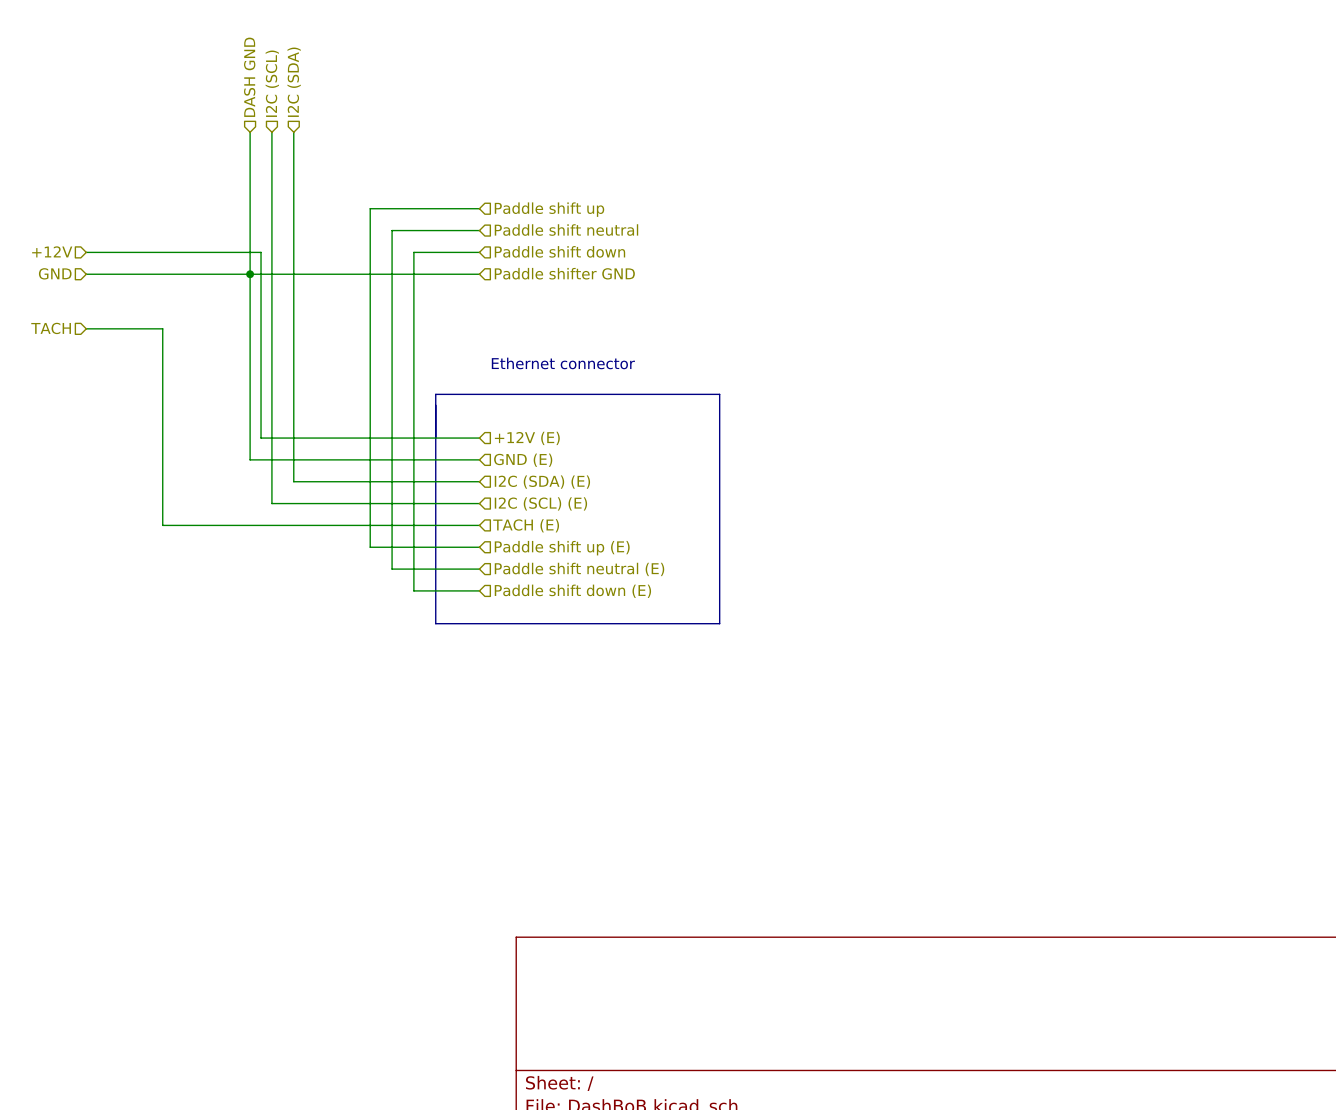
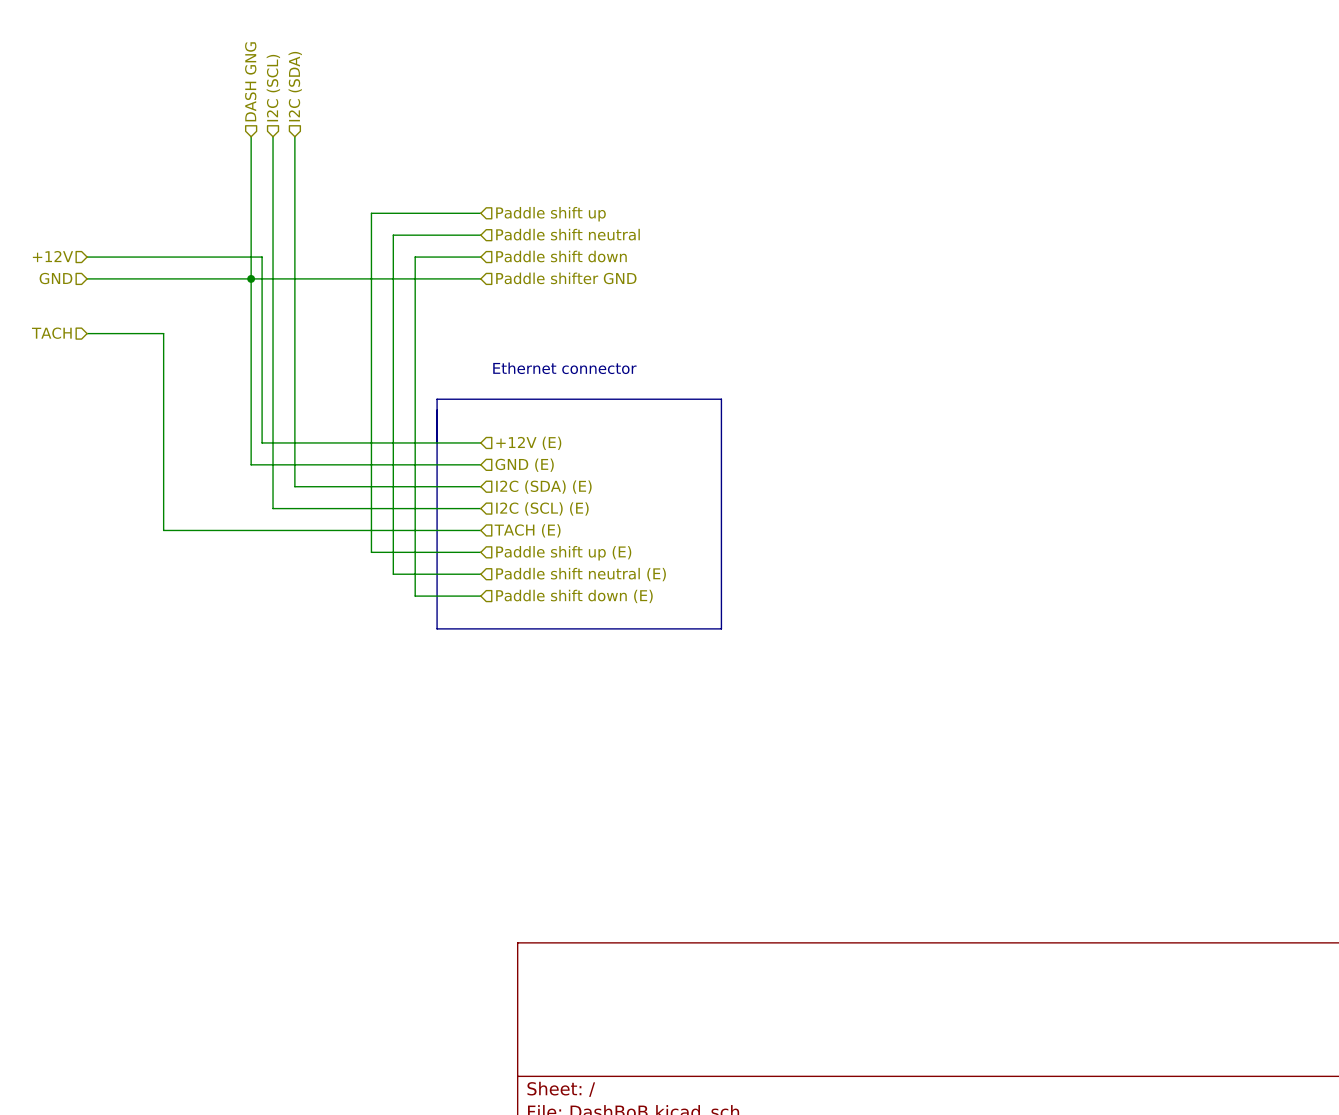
hierarchical label: DASH GND (249, 77) -> DASH GNG (250, 81)

